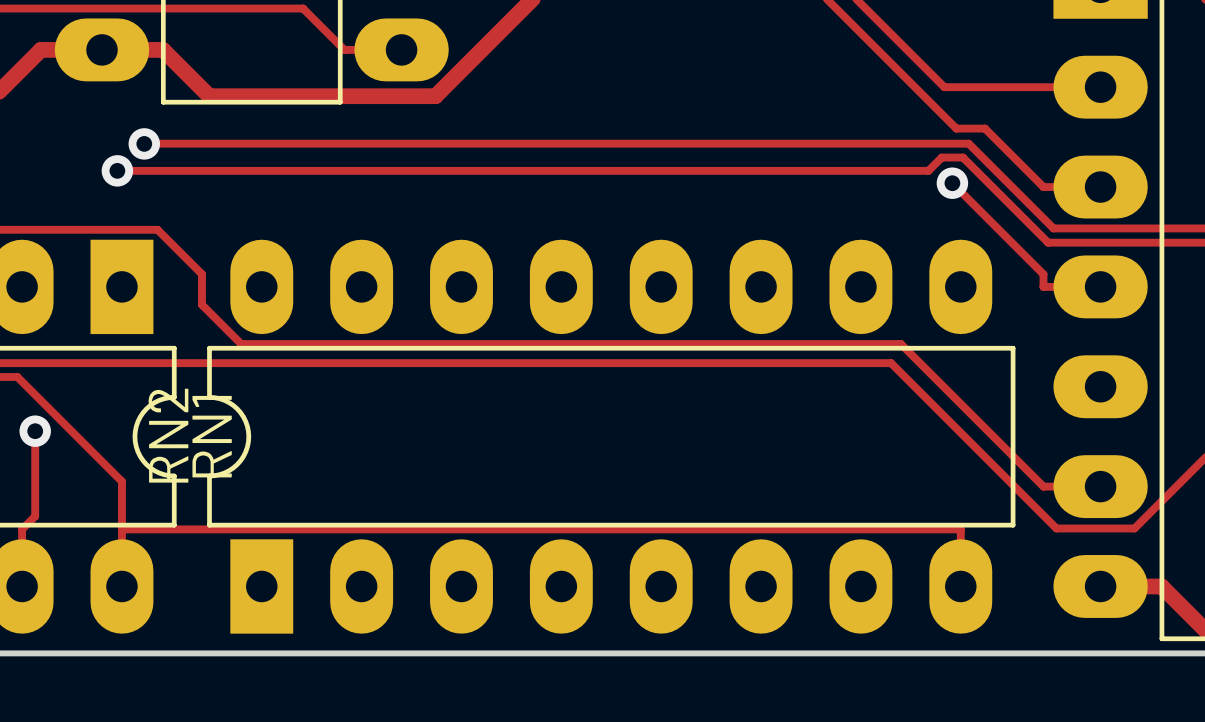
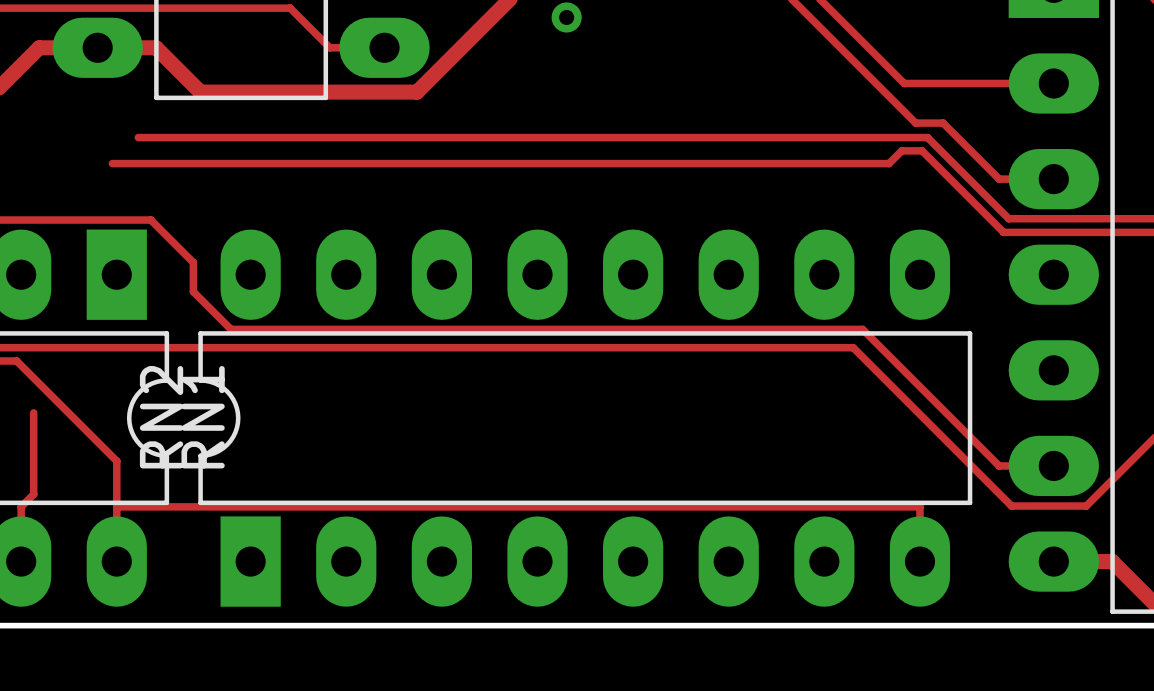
via: none -> (566, 17)
via: (144, 143) -> none
via: (117, 170) -> none
track: (952, 183) (1043, 274) (1043, 286) (1100, 286) -> none
via: (952, 183) -> none
via: (35, 431) -> none

